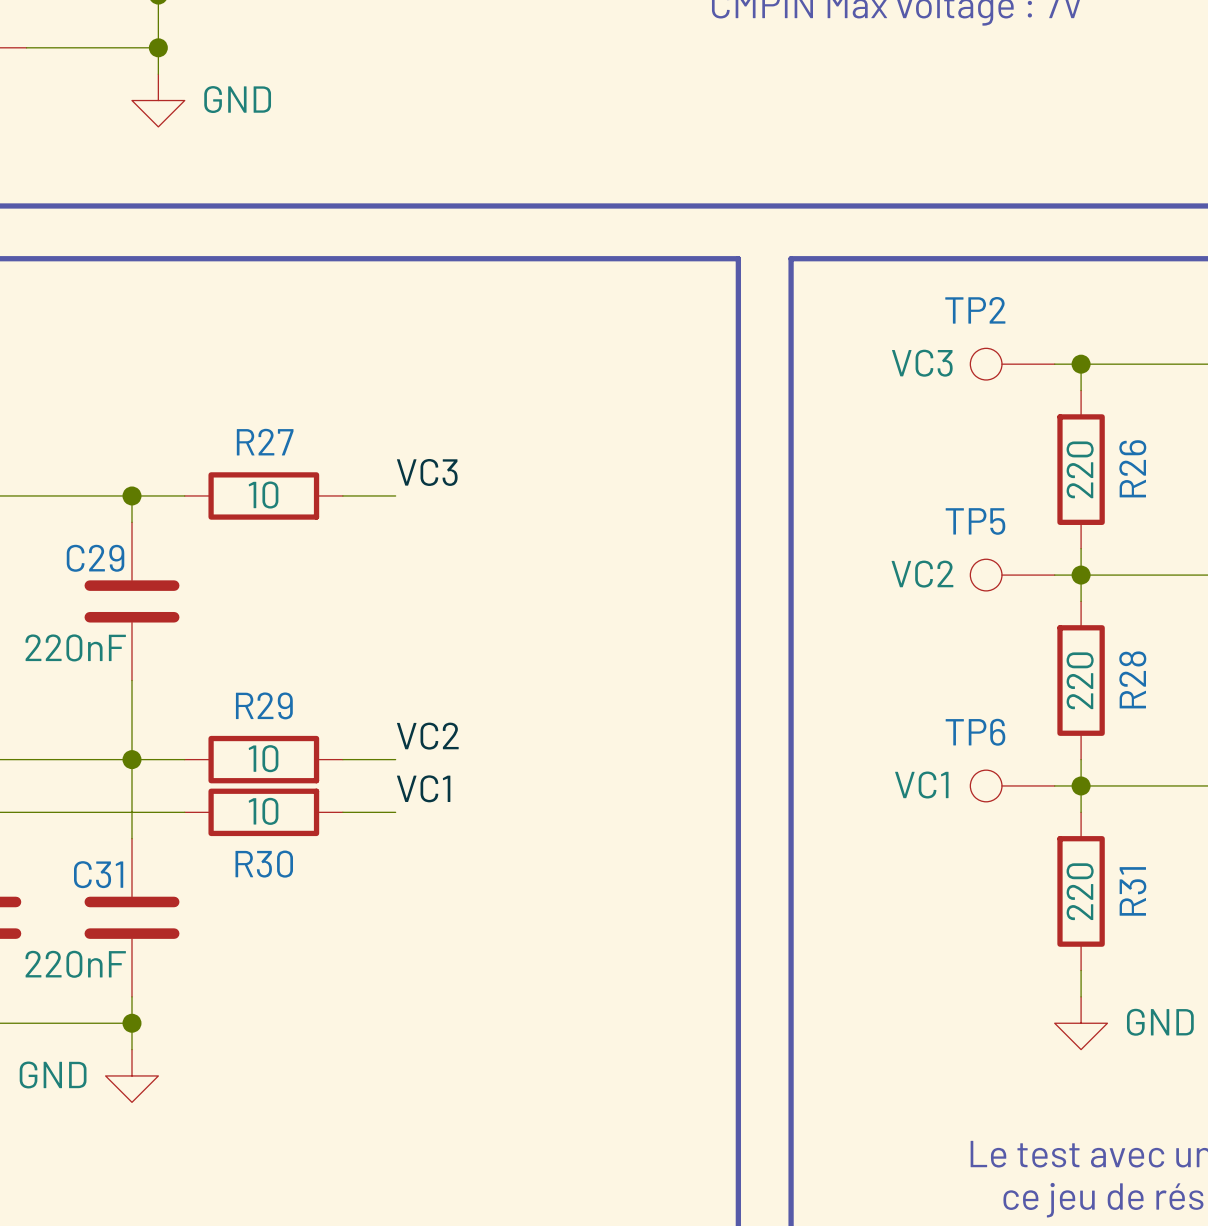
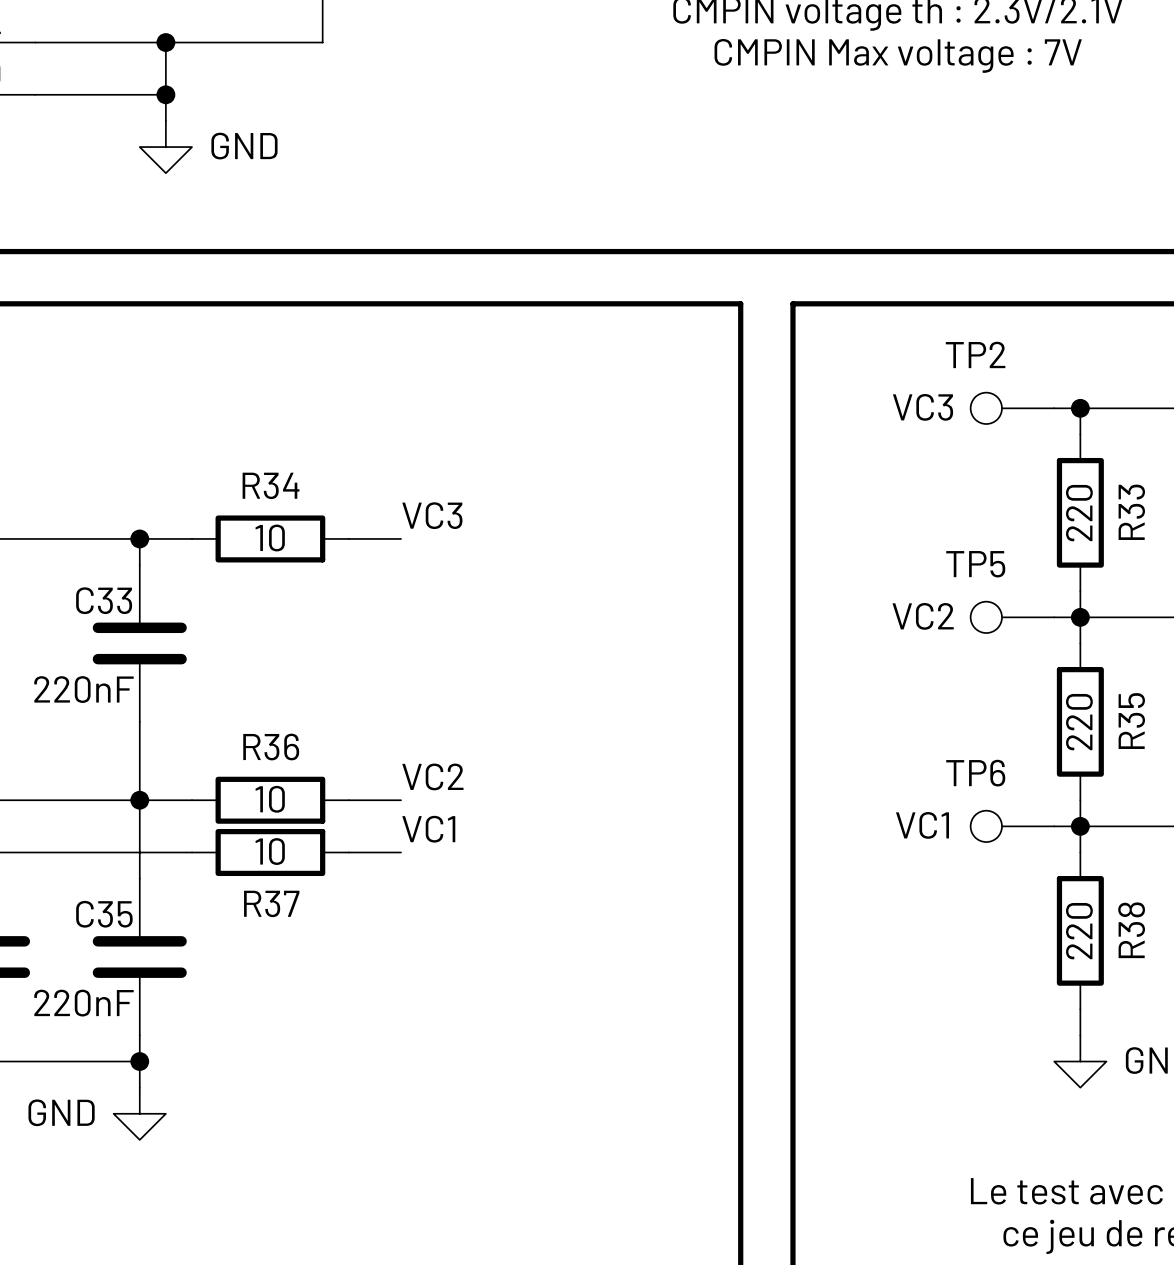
R27 name: R27 (265, 442) -> R34 (271, 485)
R26 name: R26 (1132, 468) -> R33 (1131, 512)
C29 name: C29 (95, 558) -> C33 (104, 600)
R28 name: R28 (1132, 679) -> R35 (1131, 721)
R29 name: R29 (264, 705) -> R36 (271, 747)
R30 name: R30 (264, 864) -> R37 (271, 903)
C31 name: C31 (98, 874) -> C35 (104, 914)
R31 name: R31 (1132, 891) -> R38 (1131, 930)

